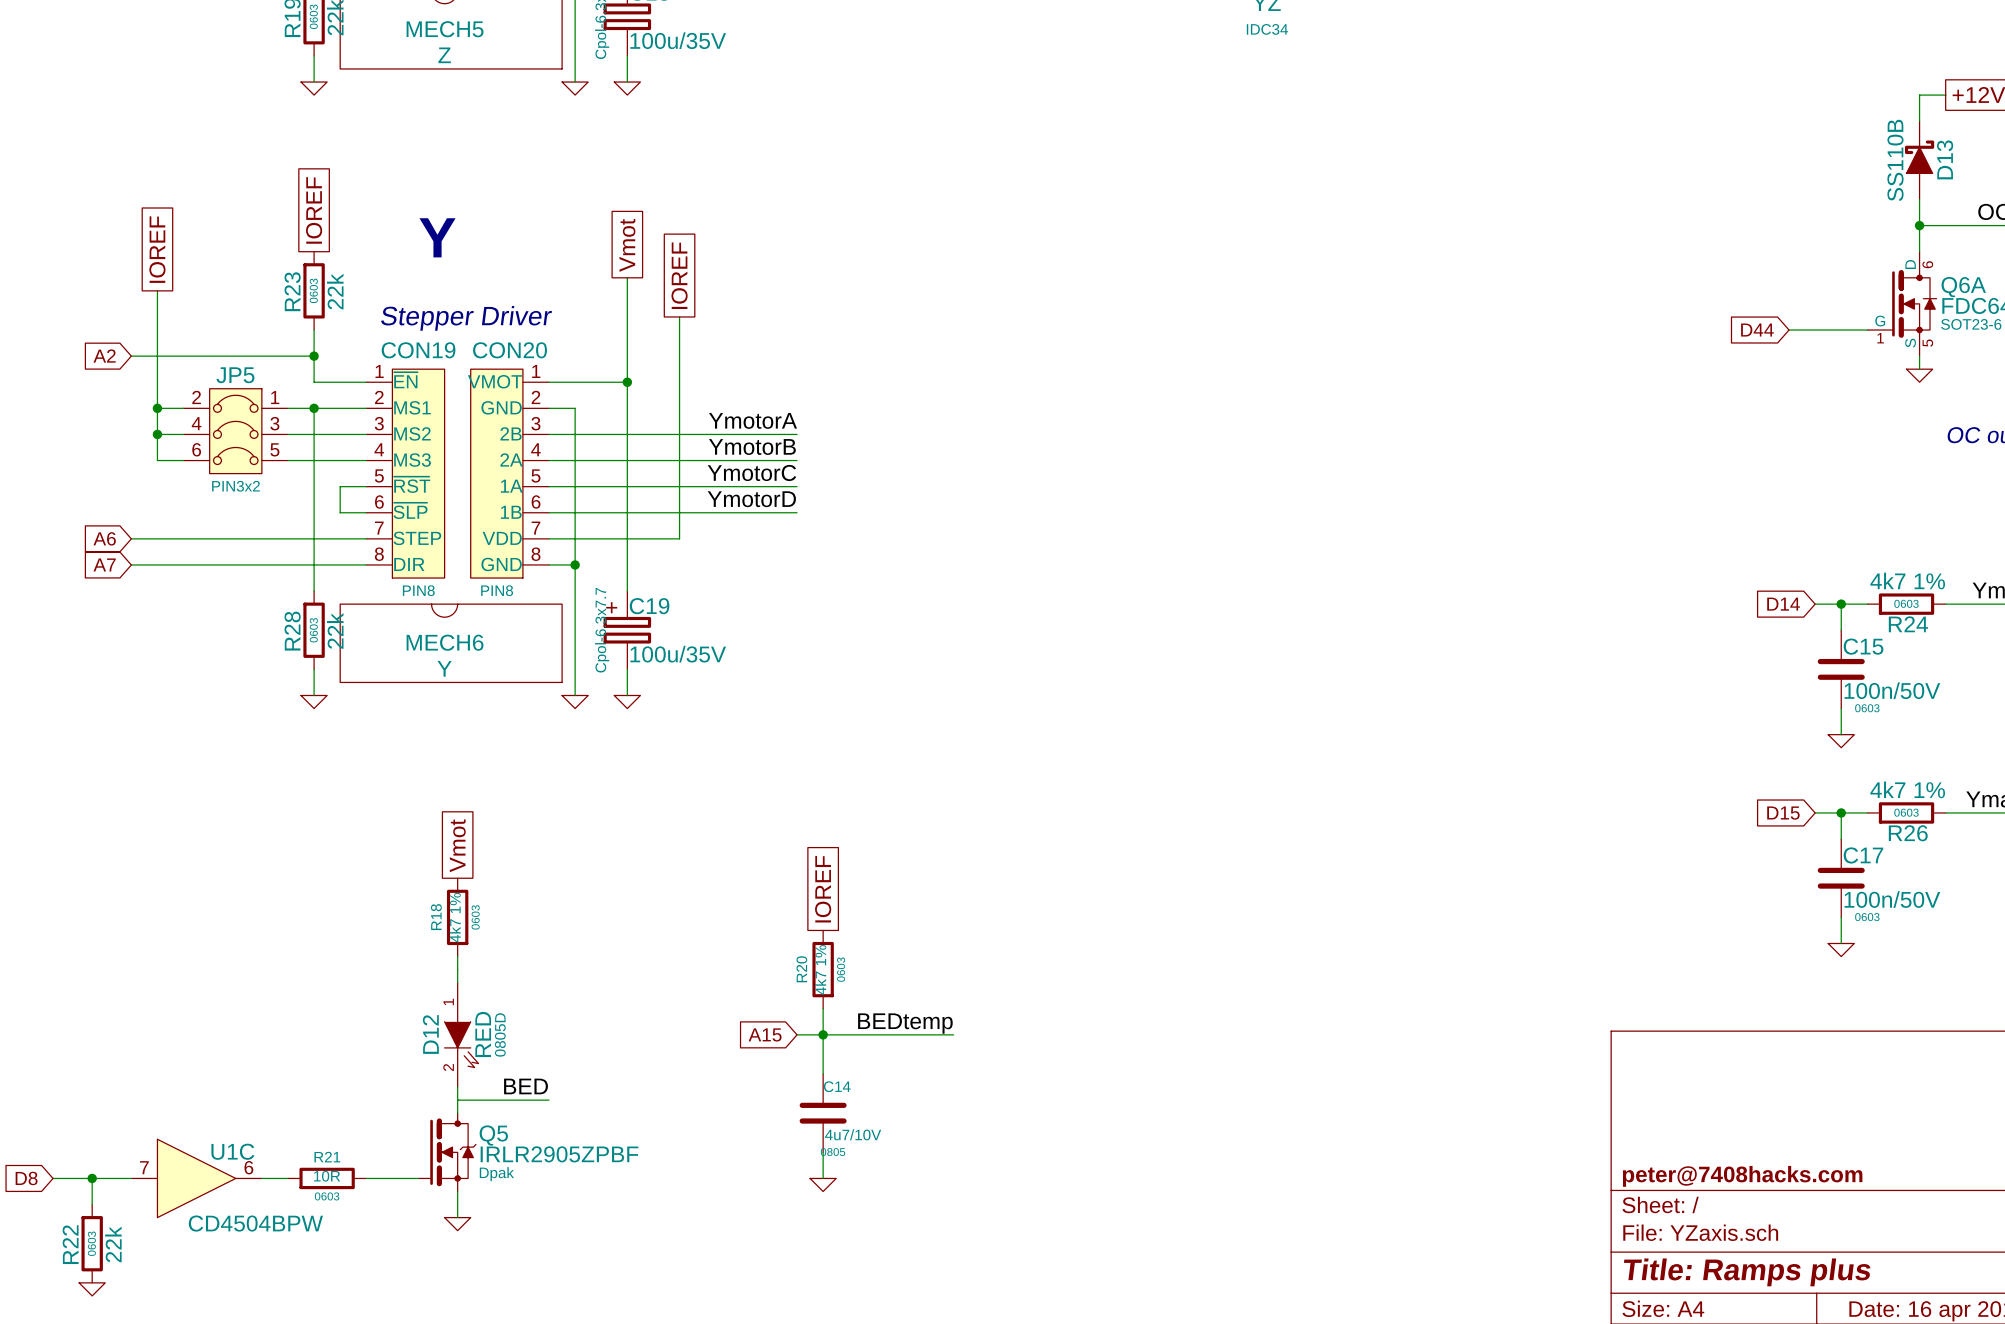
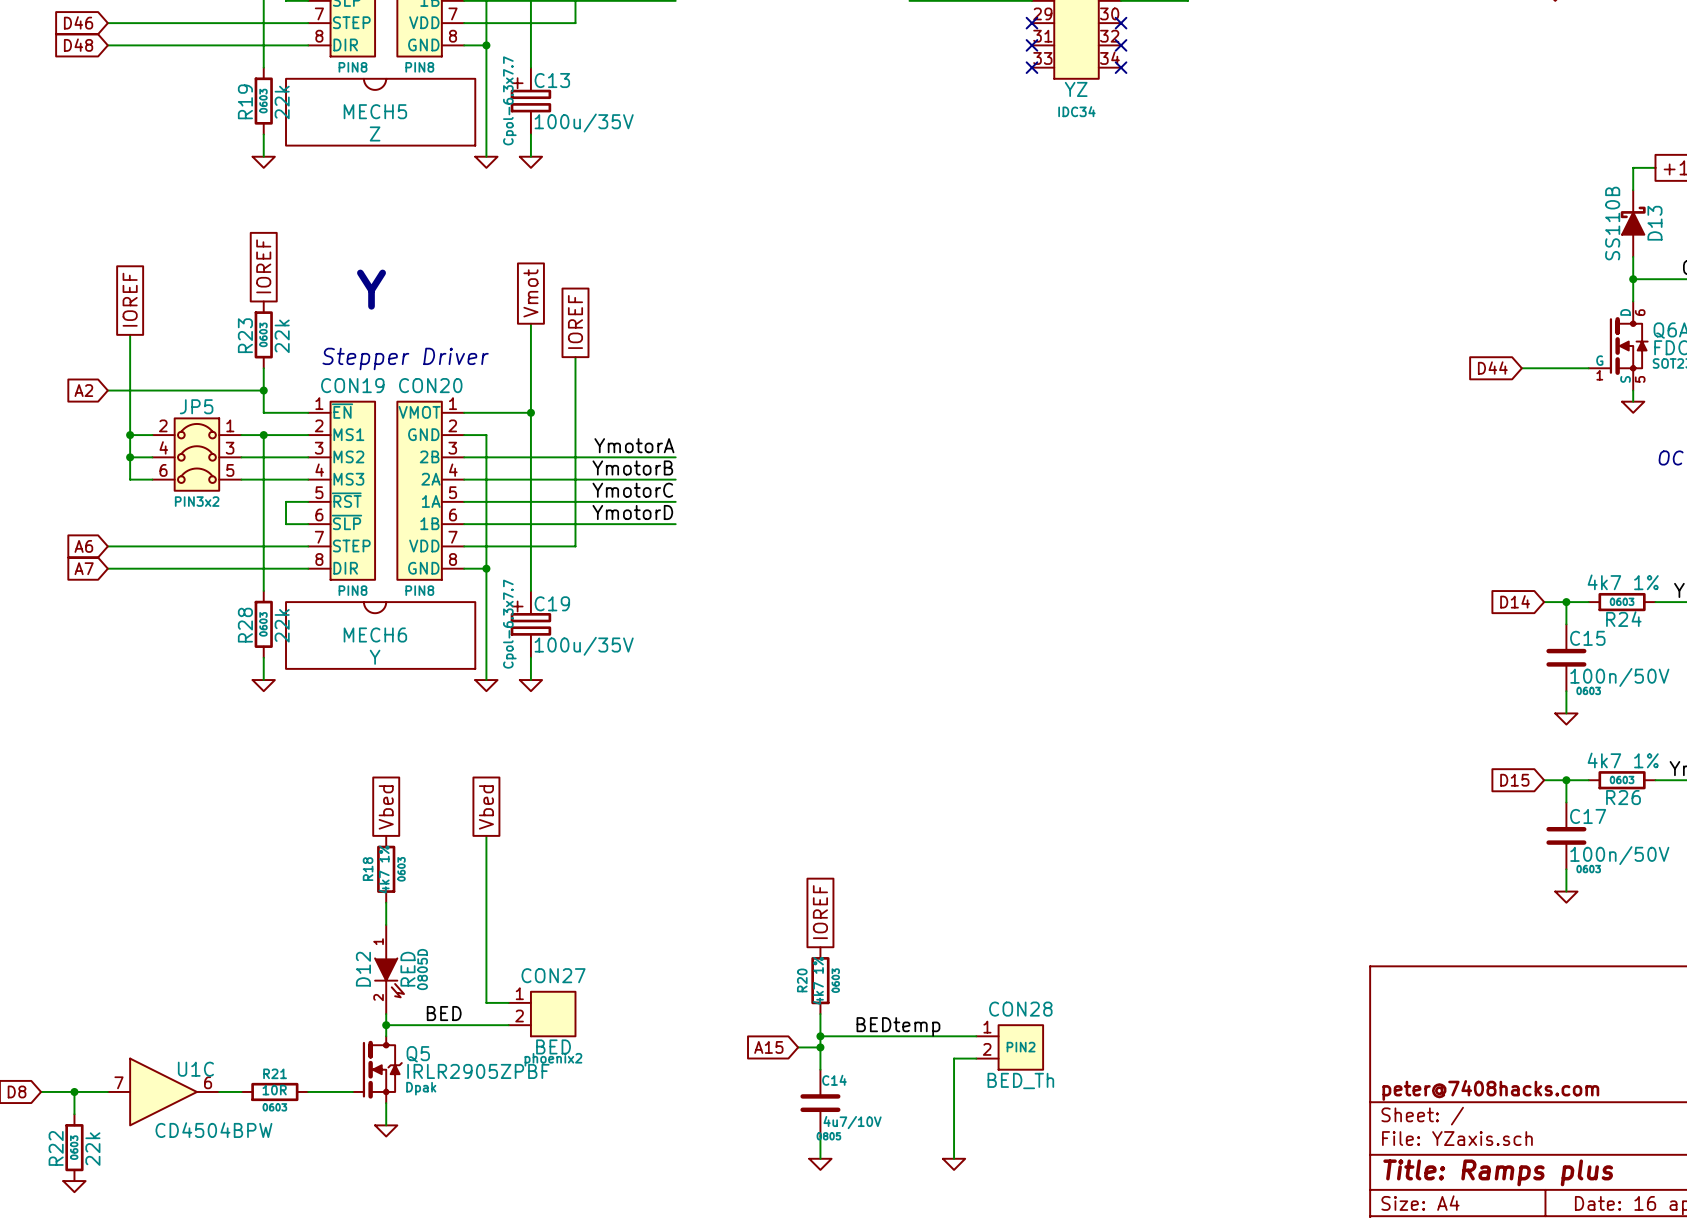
global label: Vmot (457, 845) -> Vbed (386, 807)
global label: none -> Vbed (486, 807)
wire: none -> (486, 835) (486, 1002) (508, 1002)
global label position: IOREF (823, 889) -> IOREF (820, 912)
R20 position: (823, 969) -> (820, 980)
wire: (823, 1008) (823, 1074) -> (820, 1014) (820, 1069)
label position: BEDtemp (905, 1023) -> BEDtemp (898, 1026)
global label position: A15 (765, 1034) -> A15 (768, 1047)
wire: (797, 1034) (953, 1034) -> none
junction: (823, 1034) -> none
CON27: none -> BED (542, 1014)
junction: none -> (386, 1025)
wire: none -> (464, 1025) (508, 1025)
C14 position: (823, 1113) -> (820, 1103)
wire: none -> (820, 1036) (976, 1036)
junction: none -> (820, 1036)
wire: none -> (798, 1047) (820, 1047)
junction: none -> (820, 1047)
CON28: none -> BED_Th (1009, 1047)
wire: none -> (976, 1058) (954, 1058) (954, 1158)
wire: (823, 1152) (823, 1178) -> (820, 1136) (820, 1158)
power symbol: (823, 1184) -> none
power symbol: none -> (820, 1164)
power symbol: none -> (954, 1164)

